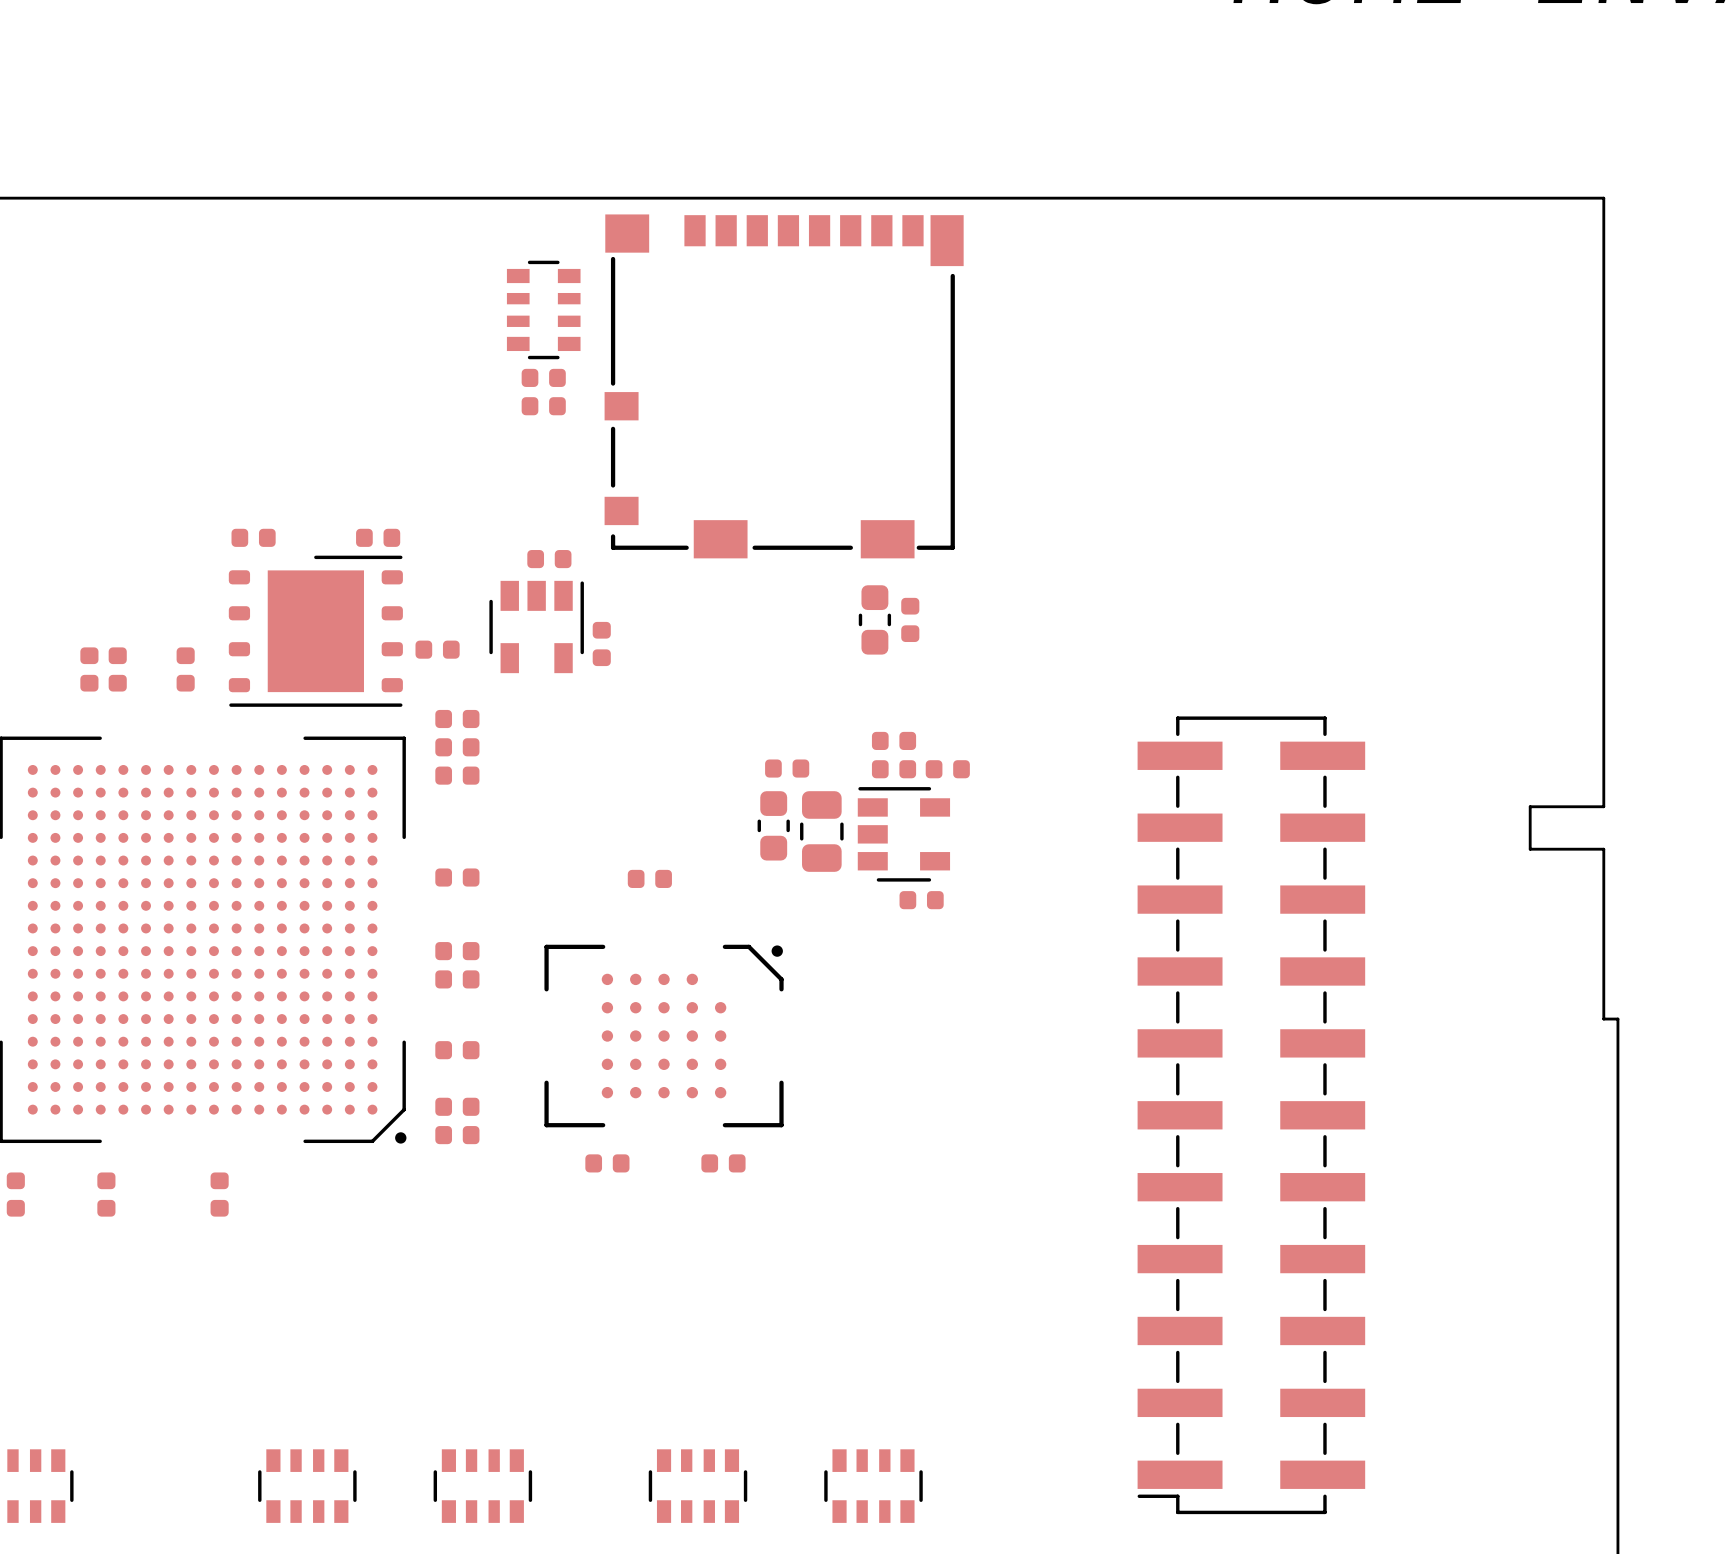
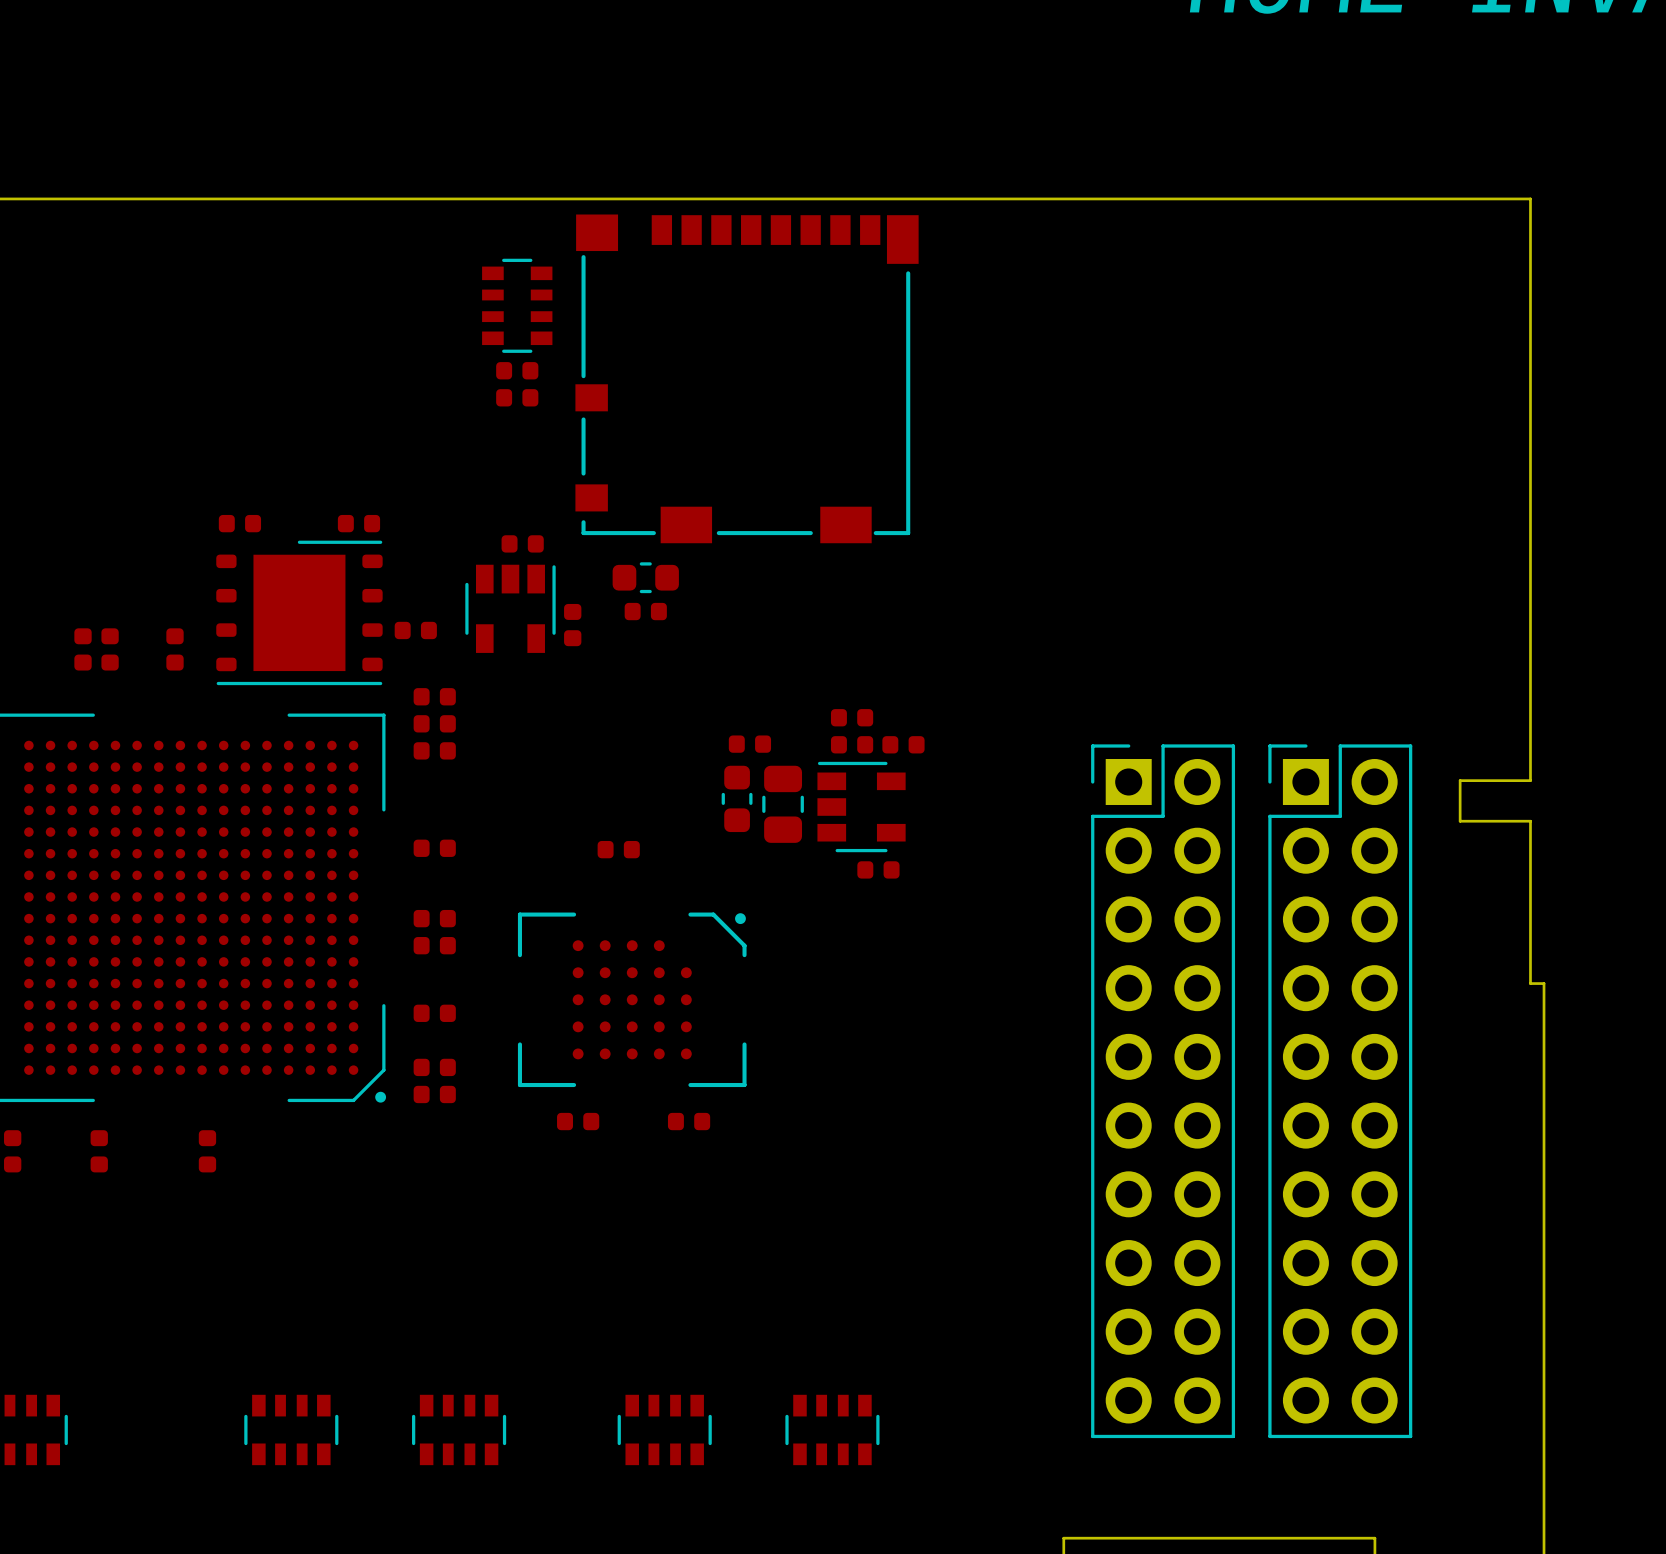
part rotation: 0° (874, 619) -> 90° clockwise (645, 577)
part position: (874, 619) -> (645, 577)
part rotation: 0° (910, 619) -> 90° clockwise (645, 611)
part position: (910, 619) -> (645, 611)
part: (1251, 1115) -> none
part: none -> (1163, 1091)
part: none -> (1340, 1091)

